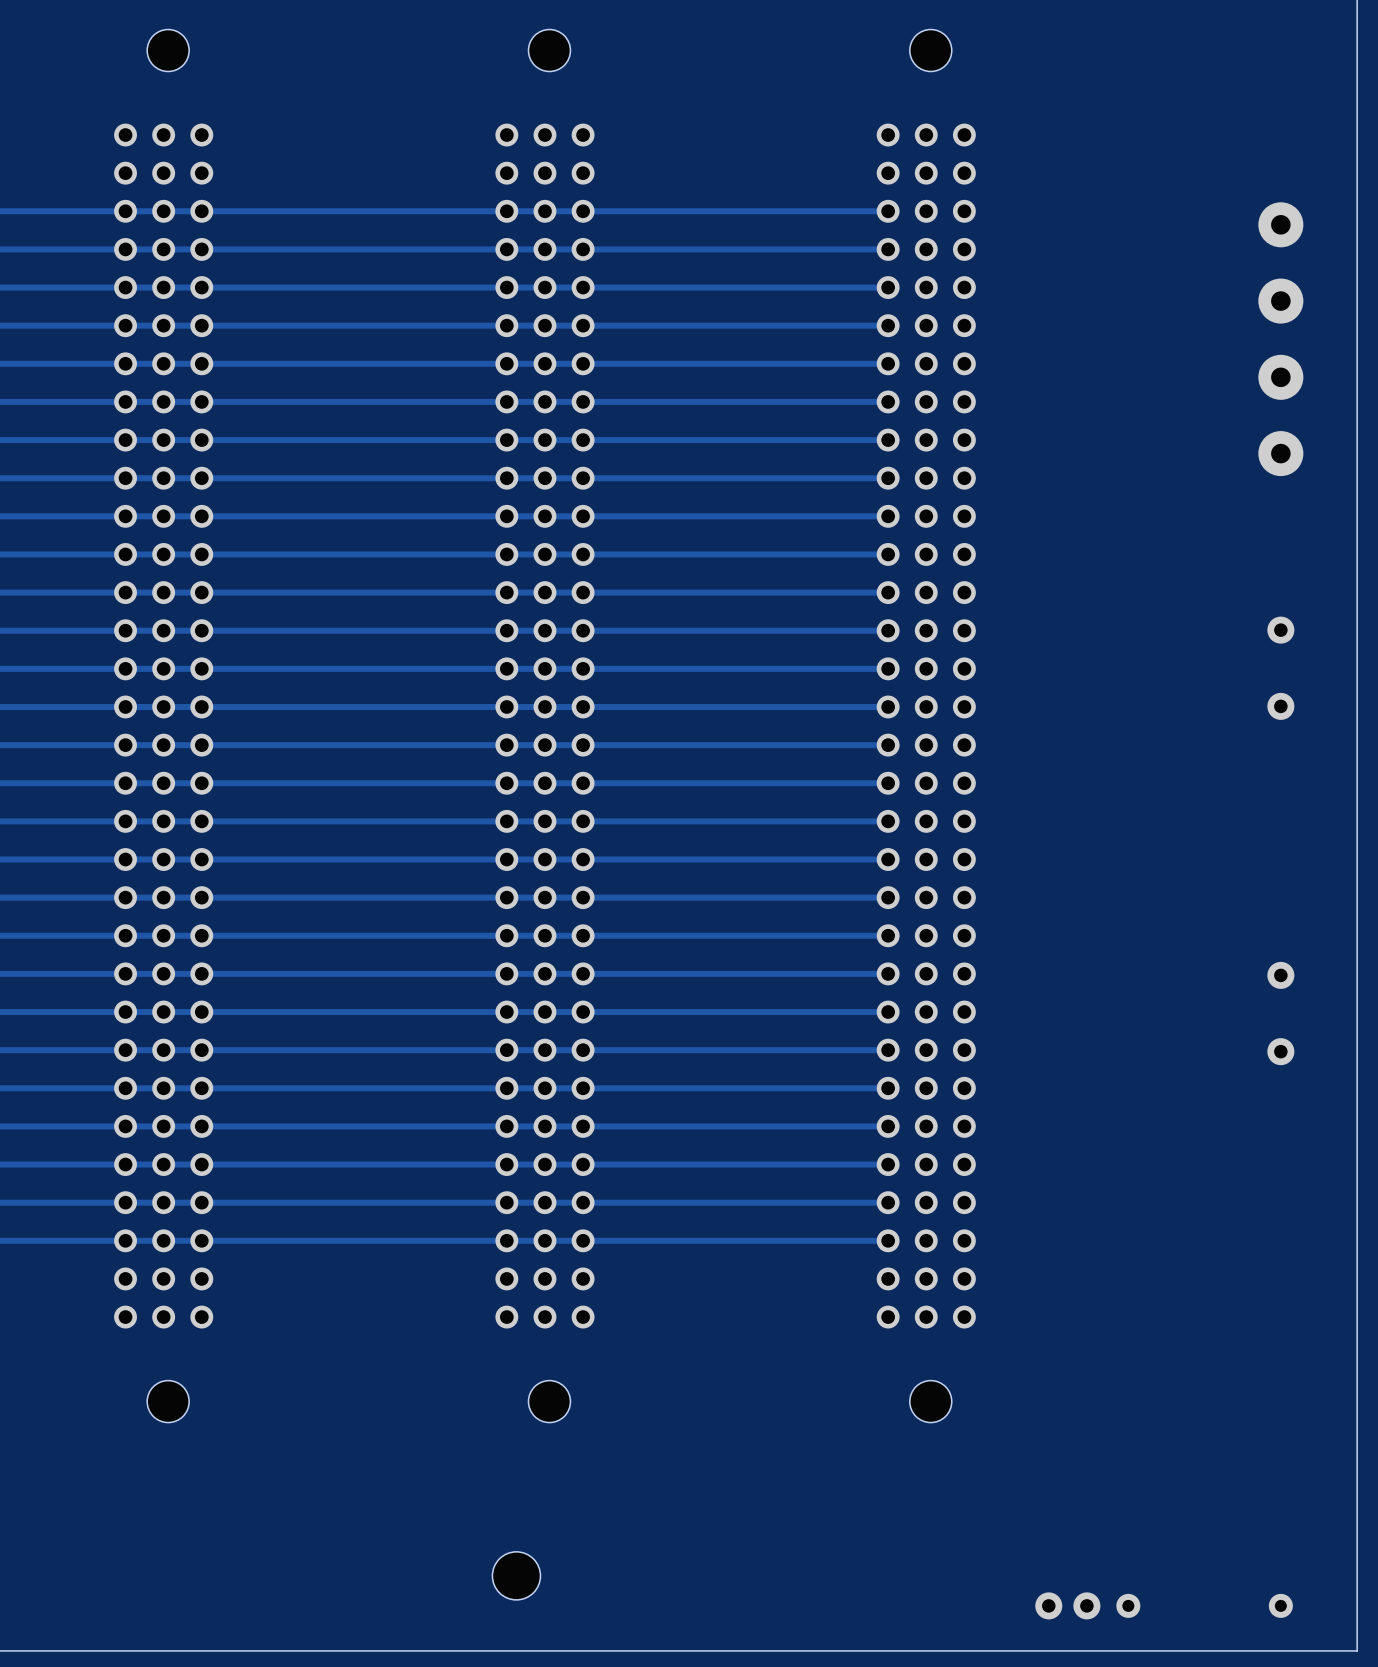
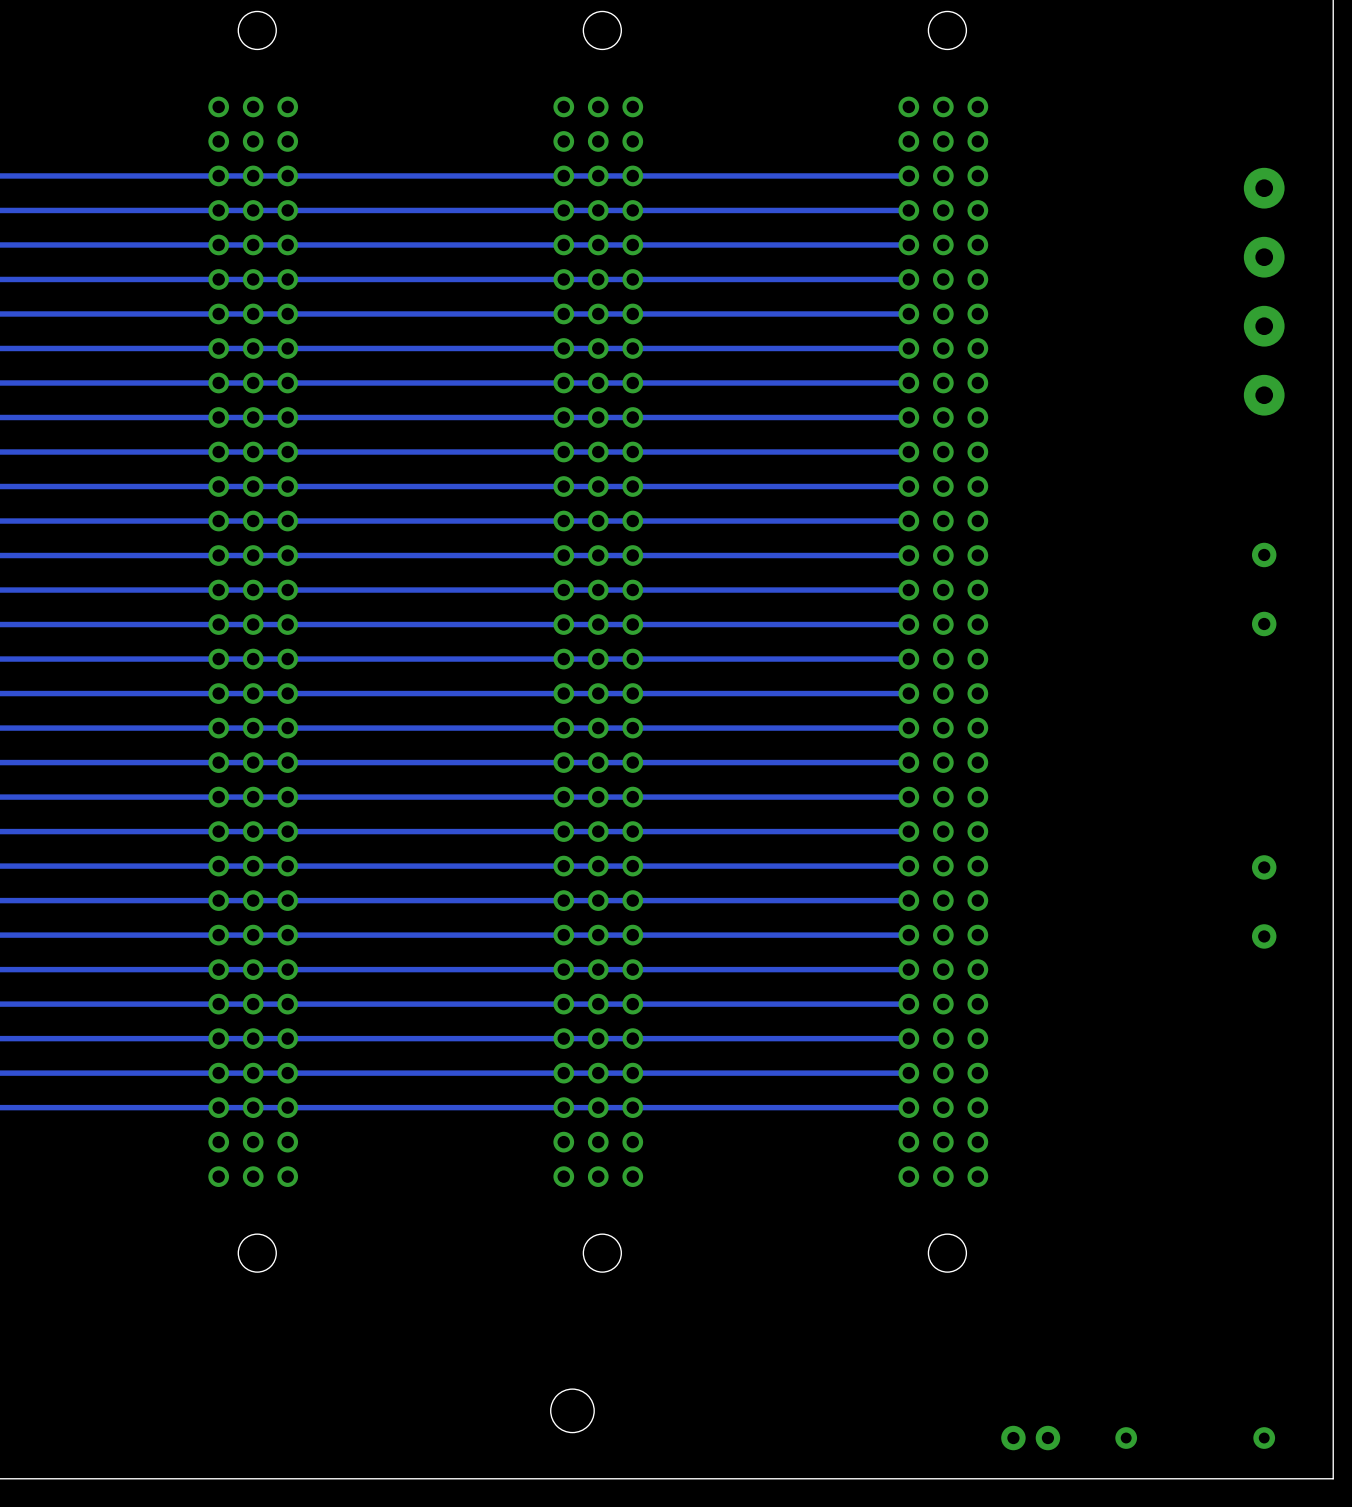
part position: (1067, 1605) -> (1030, 1438)

